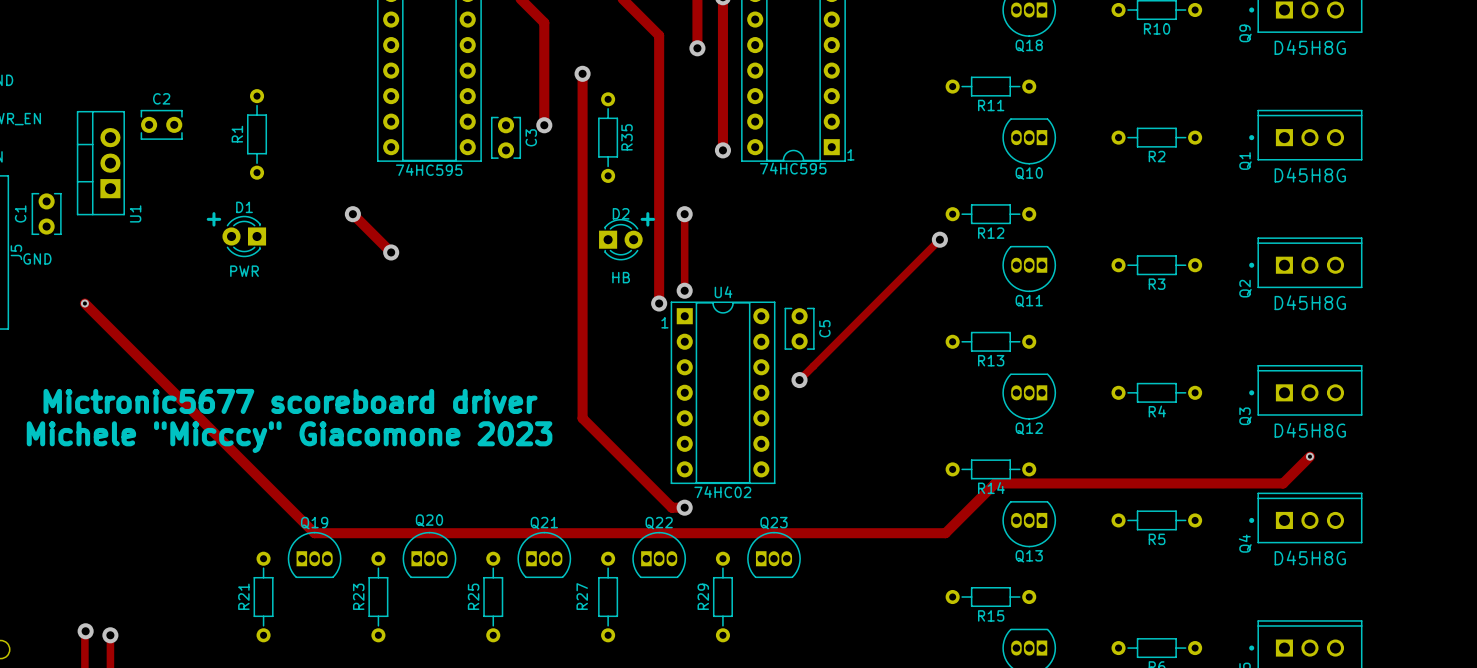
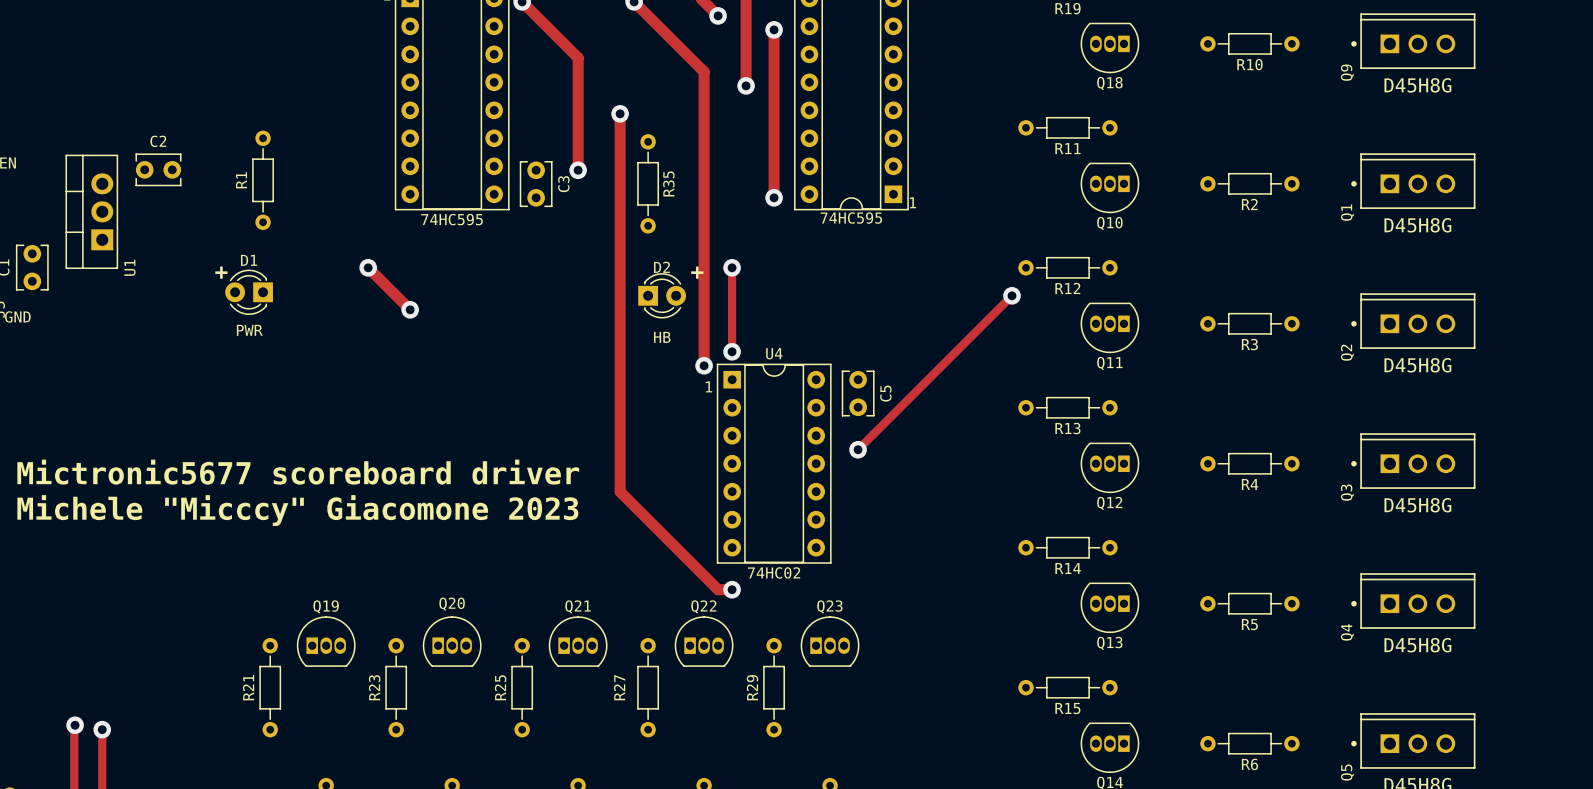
track: (84, 303) (314, 533) (945, 533) (995, 483) (1283, 483) (1309, 456) -> none
via: (84, 303) -> none
via: (1309, 456) -> none

